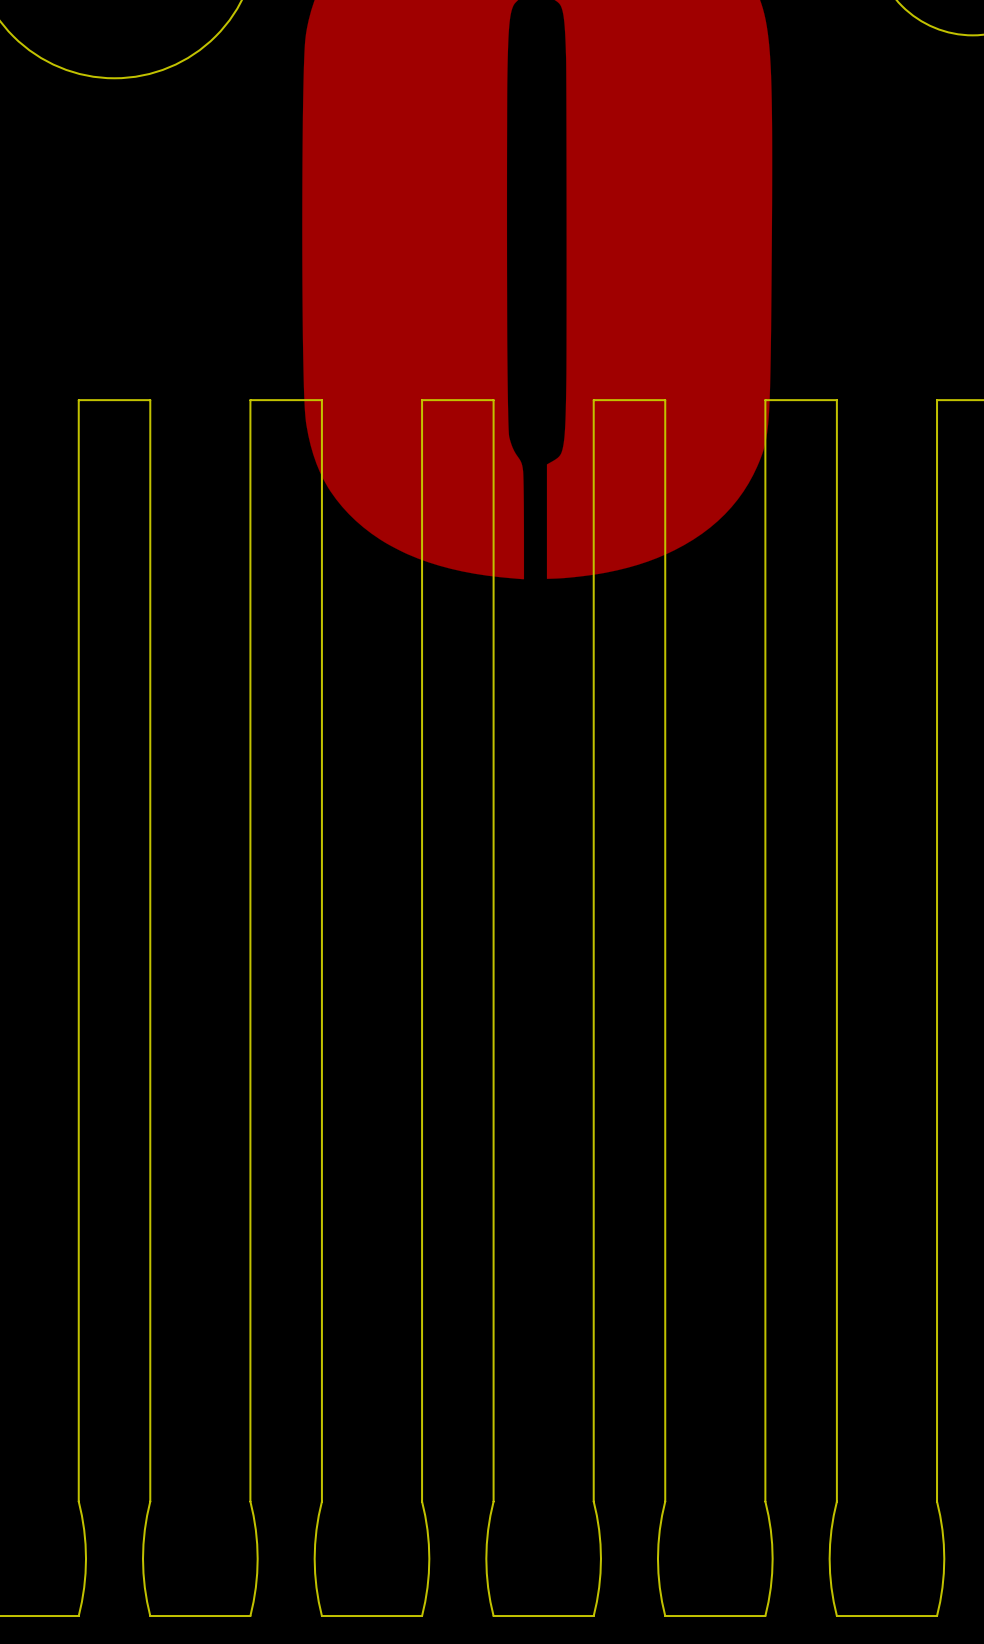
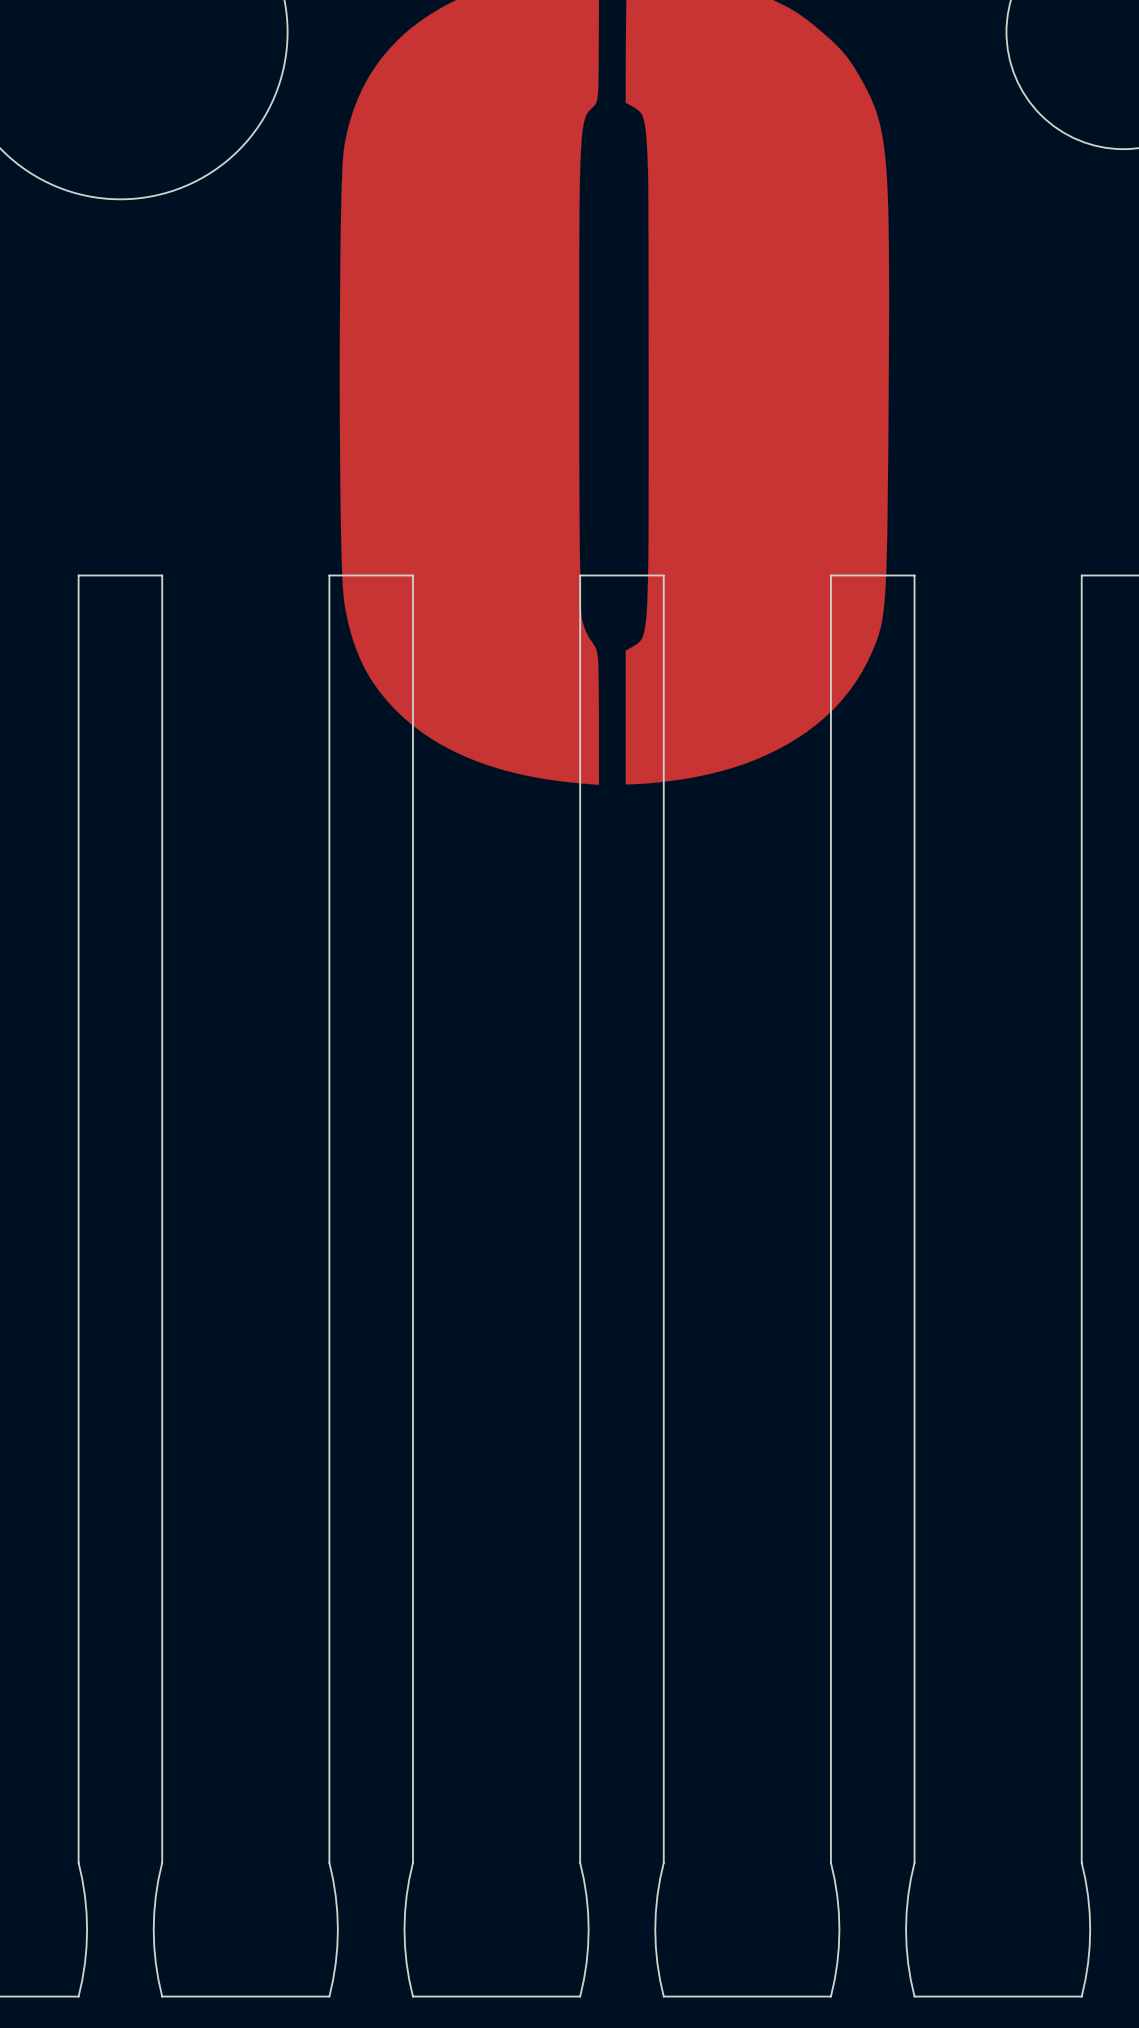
board edge: (293, 400) (250, 400) (250, 1501) (255, 1529) (257, 1558) (255, 1587) (250, 1616) -> (329, 575) (329, 1862) (337, 1912) (337, 1946) (329, 1996) (279, 1996)
board edge: (321, 400) (321, 1501) (315, 1544) (315, 1573) (321, 1616) (364, 1616) -> (362, 575) (412, 575) (412, 1862) (406, 1895) (404, 1929) (406, 1963) (412, 1996)
board edge: (765, 400) (765, 1501) (772, 1544) (772, 1573) (765, 1616) (722, 1616) -> (881, 575) (830, 575) (830, 1862) (837, 1895) (839, 1929) (837, 1963) (830, 1996)
board edge: (793, 400) (836, 400) (836, 1501) (831, 1529) (829, 1558) (831, 1587) (836, 1616) -> (914, 575) (914, 1862) (906, 1912) (906, 1946) (914, 1996) (964, 1996)
board edge: (493, 1616) (488, 1587) (486, 1558) (488, 1529) (493, 1501) (493, 400) (422, 400) (422, 1501) (427, 1529) (429, 1558) (427, 1587) (422, 1616) -> (563, 1996) (479, 1996)
board edge: (579, 1616) (507, 1616) -> (663, 1996) (657, 1963) (655, 1929) (657, 1895) (663, 1862) (663, 575) (580, 575) (580, 1862) (586, 1895) (588, 1929) (586, 1963) (580, 1996)
board edge: (665, 1616) (659, 1587) (657, 1558) (659, 1529) (665, 1501) (665, 400) (593, 400) (593, 1501) (599, 1529) (600, 1558) (599, 1587) (593, 1616) -> (764, 1996) (680, 1996)

